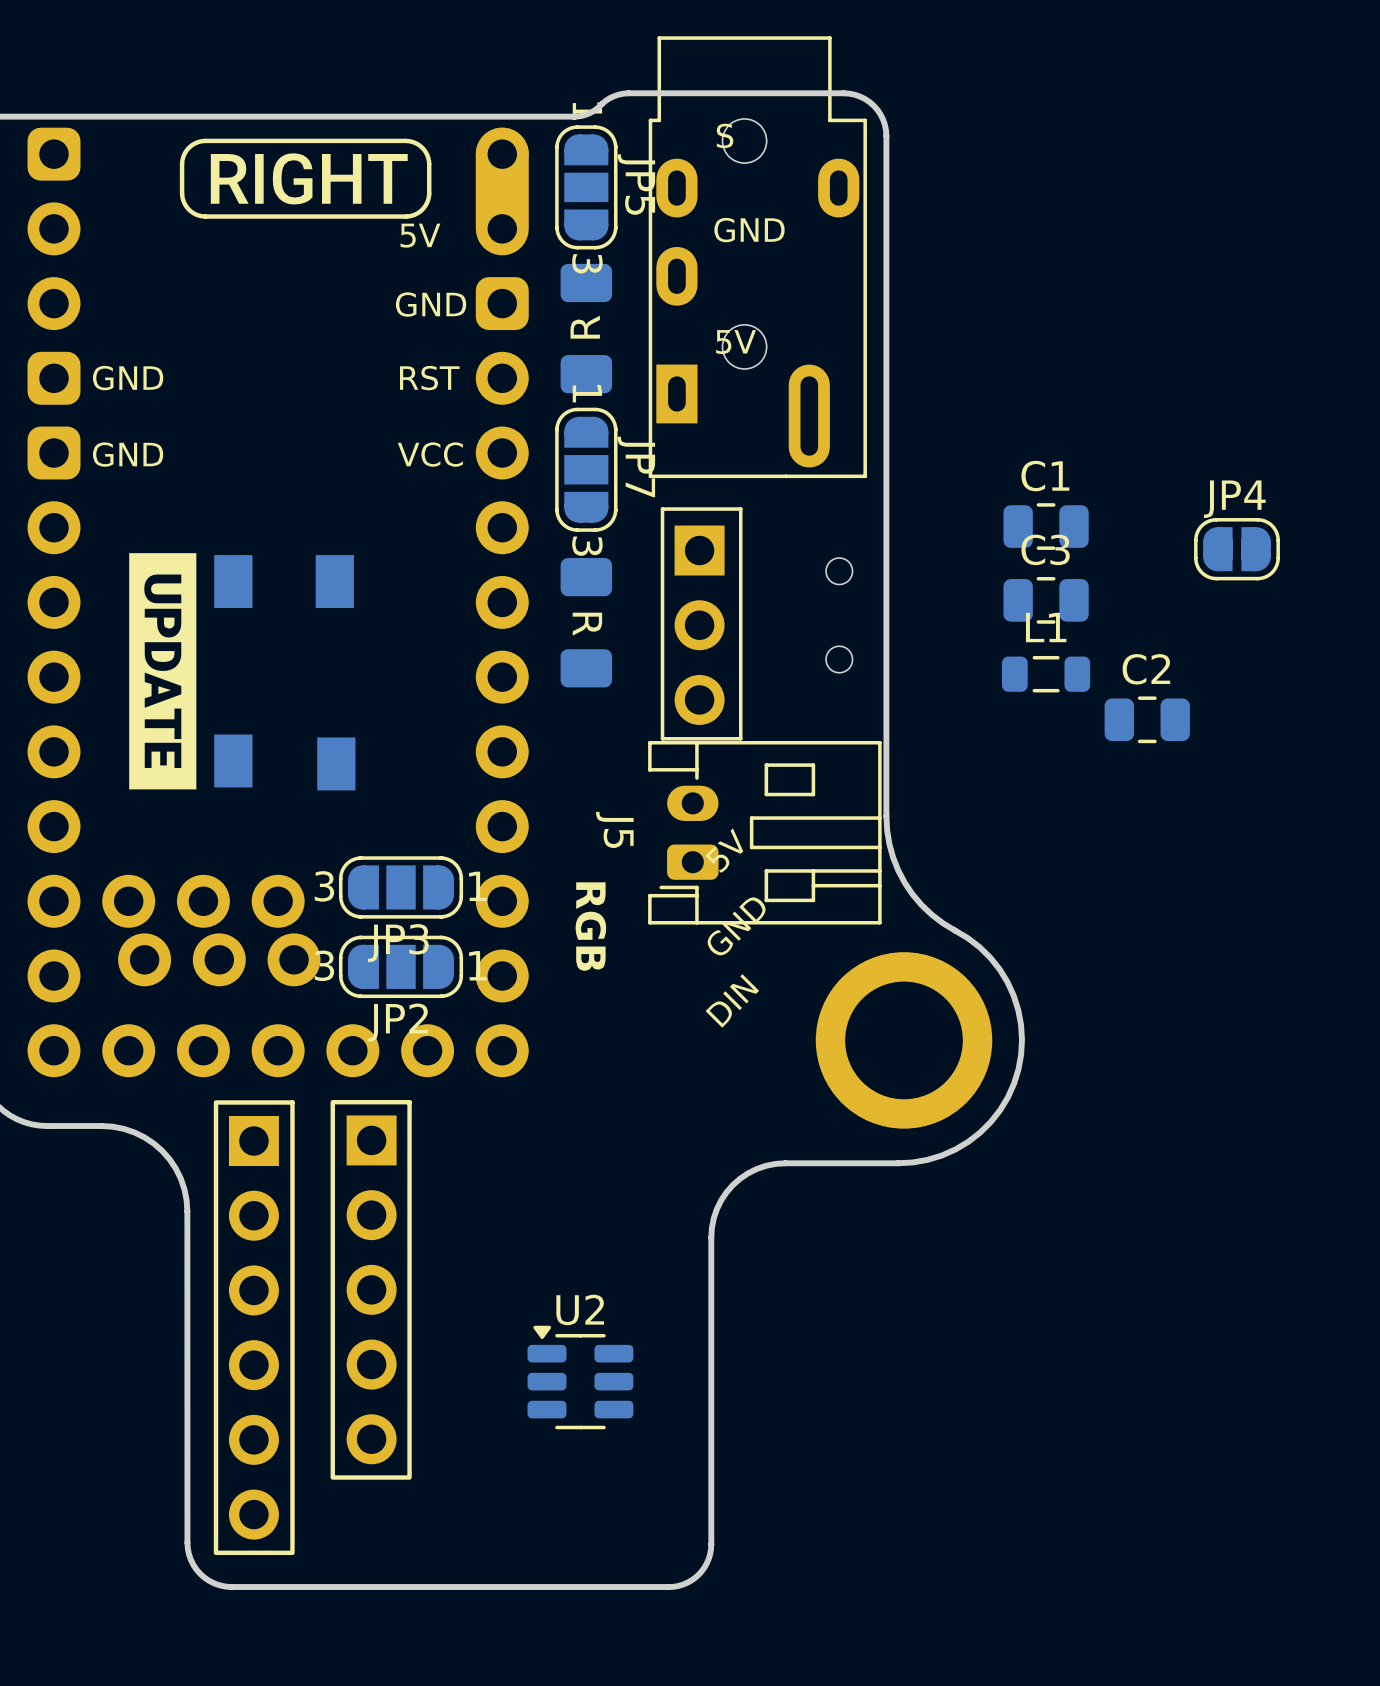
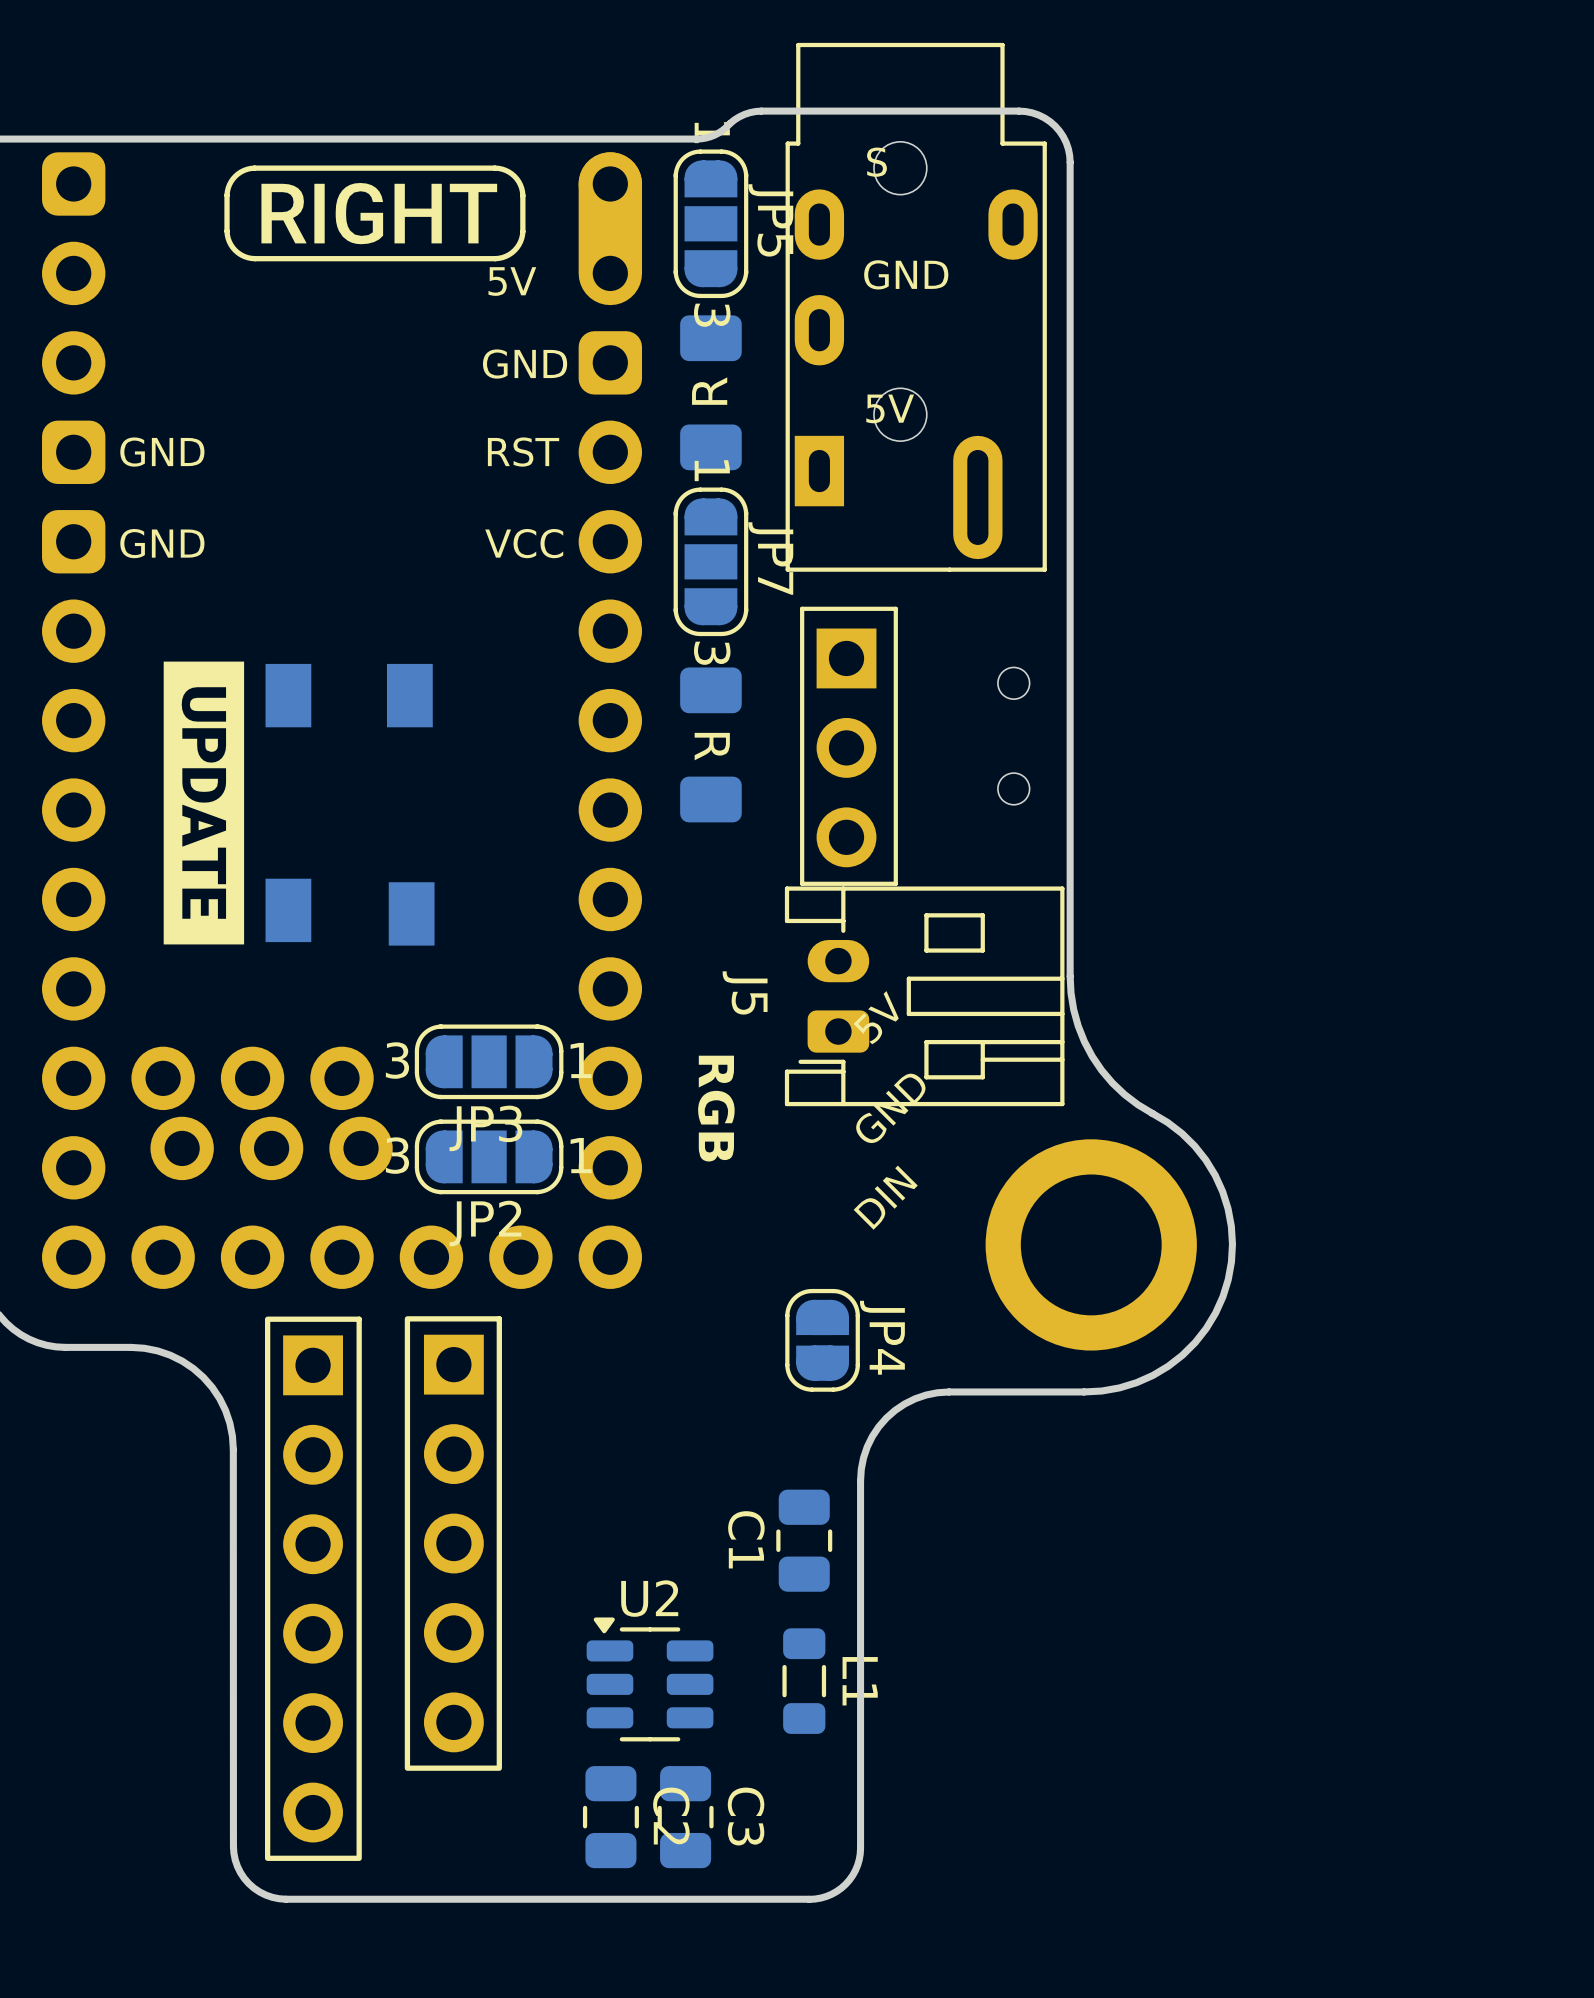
C1 name position: C1 (1045, 476) -> C1 (746, 1539)
C1 rotation: 0° (1046, 526) -> 90° clockwise (804, 1540)
C1 position: (1046, 526) -> (804, 1540)
JP4 rotation: 0° (1236, 549) -> 90° clockwise (822, 1340)
JP4 position: (1236, 549) -> (822, 1340)
C3 rotation: 0° (1046, 600) -> 90° clockwise (685, 1817)
C3 position: (1046, 600) -> (685, 1817)
L1 rotation: 0° (1046, 674) -> 90° clockwise (804, 1681)
L1 position: (1046, 674) -> (804, 1681)
C2 rotation: 0° (1147, 719) -> 90° clockwise (610, 1817)
C2 position: (1147, 719) -> (610, 1817)
U2 position: (580, 1377) -> (650, 1679)

